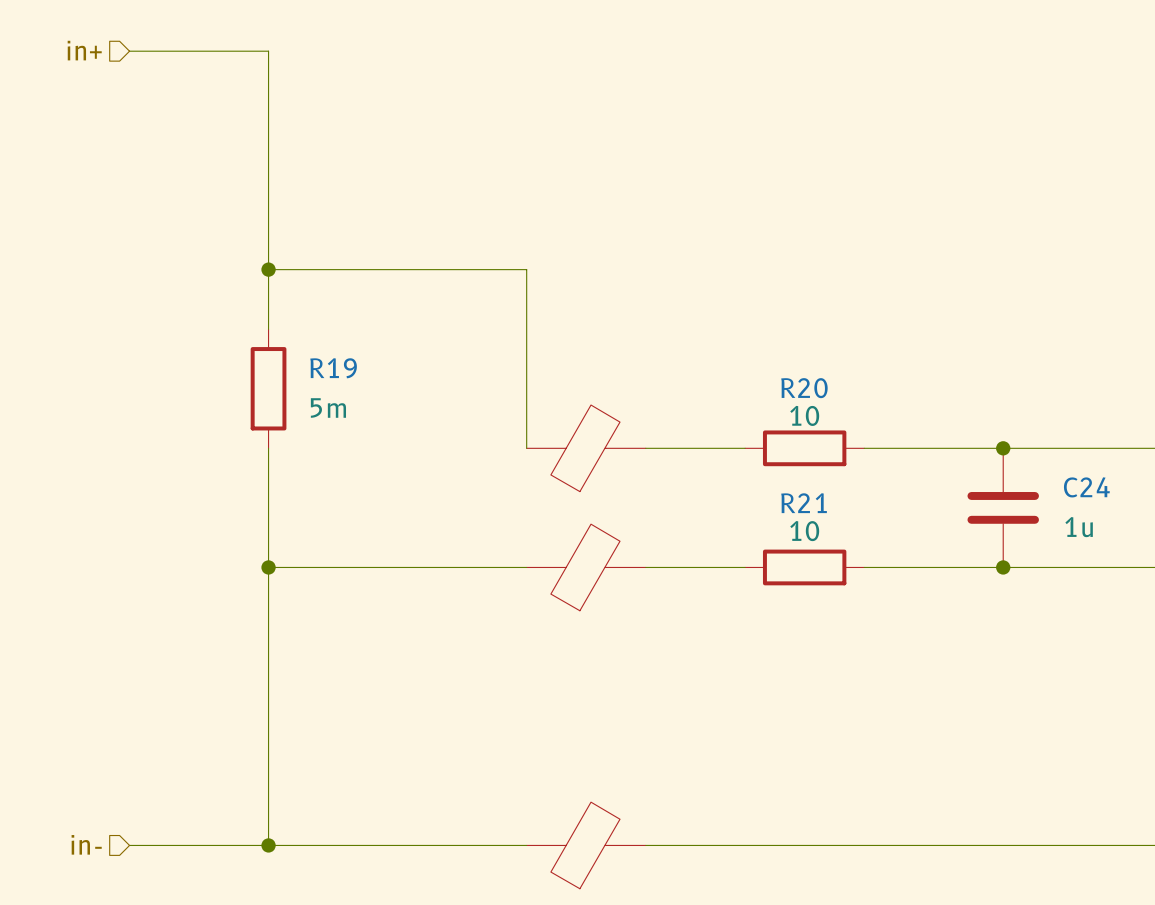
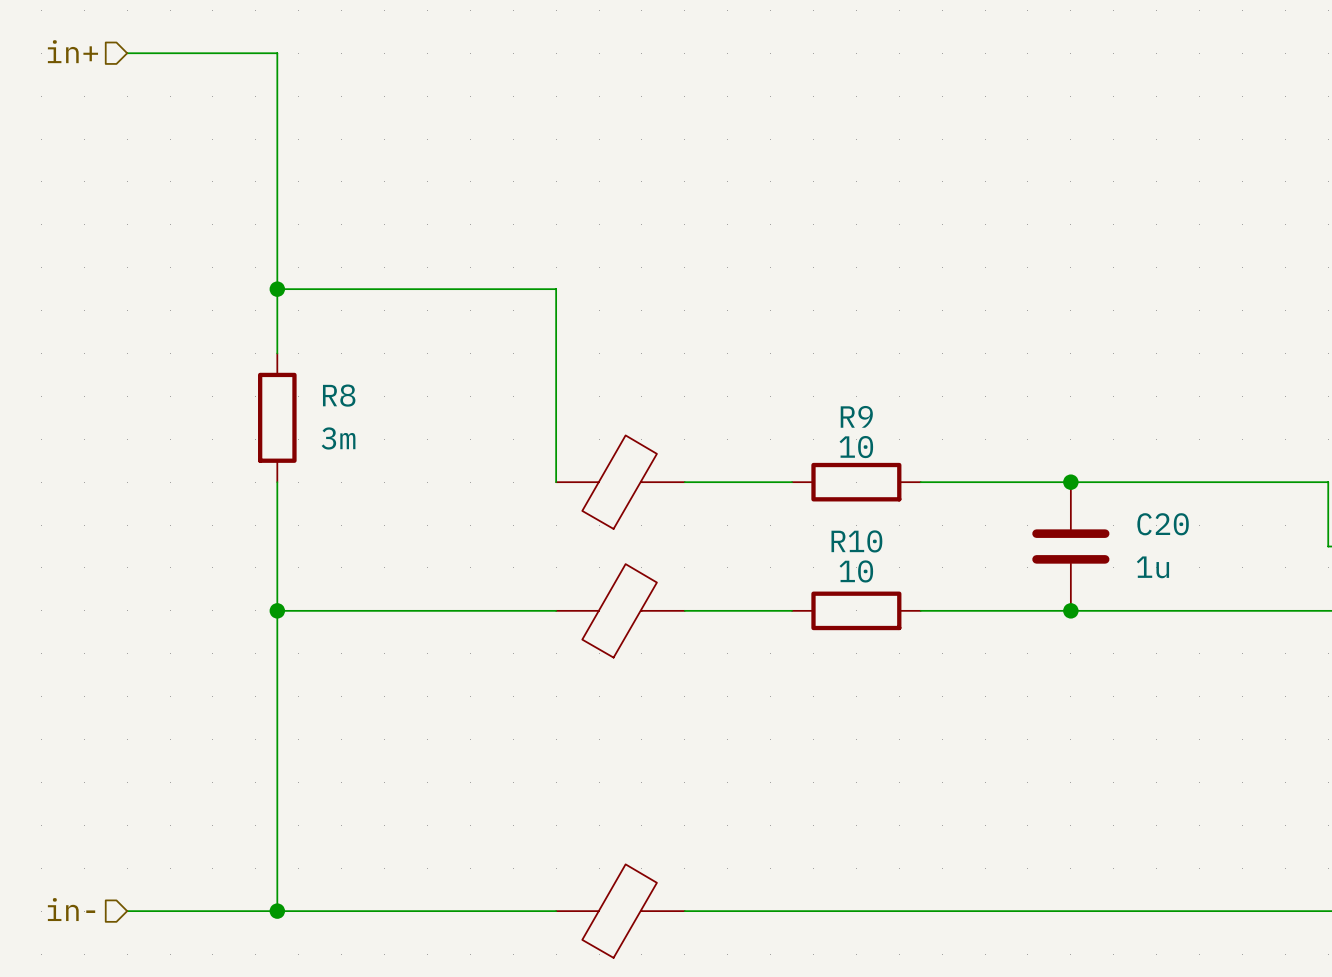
R19 name: R19 (333, 368) -> R8 (339, 395)
R20 name: R20 (804, 388) -> R9 (856, 416)
R19 value: 5m (328, 408) -> 3m (338, 438)
C24 name: C24 (1086, 487) -> C20 (1163, 524)
R21 name: R21 (804, 503) -> R10 (856, 541)

